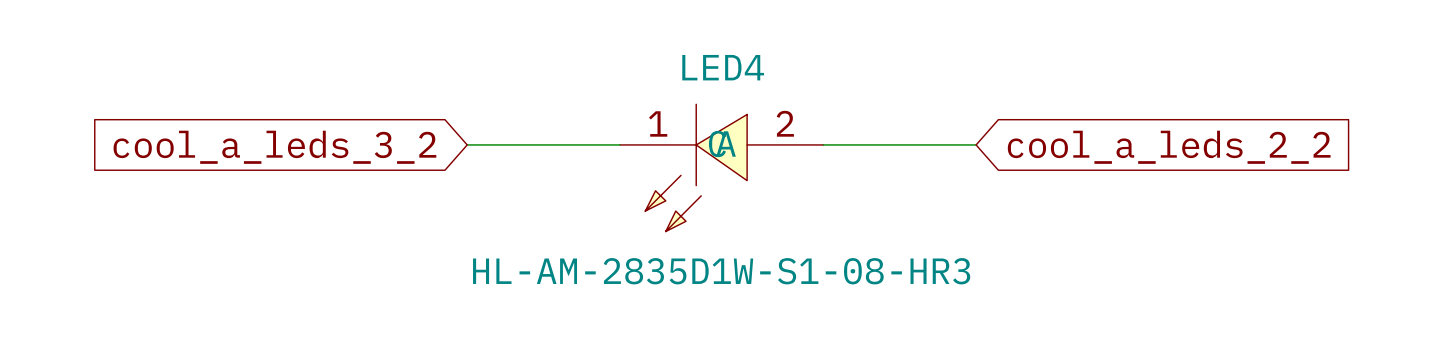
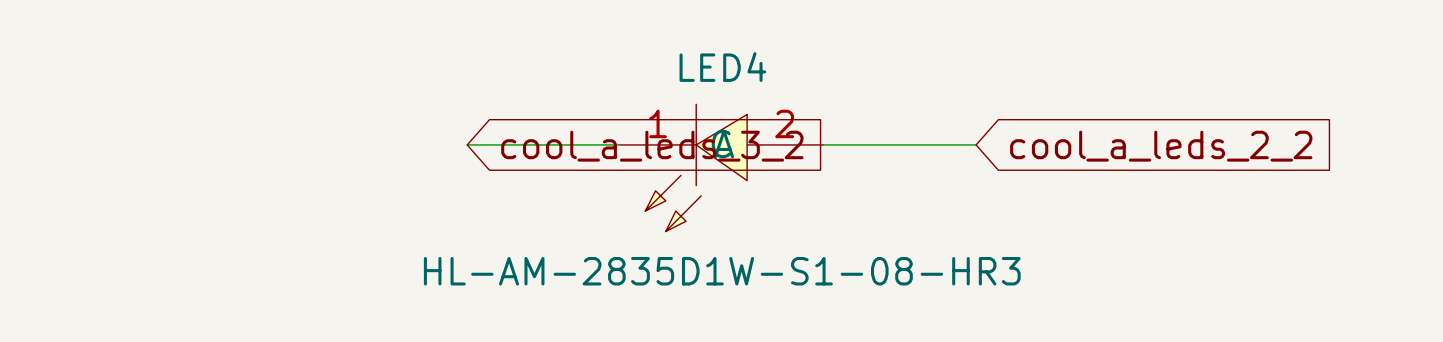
global label rotation: 0° (274, 147) -> 180° (652, 146)
global label position: cool_a_leds_3_2 (274, 147) -> cool_a_leds_3_2 (652, 146)

